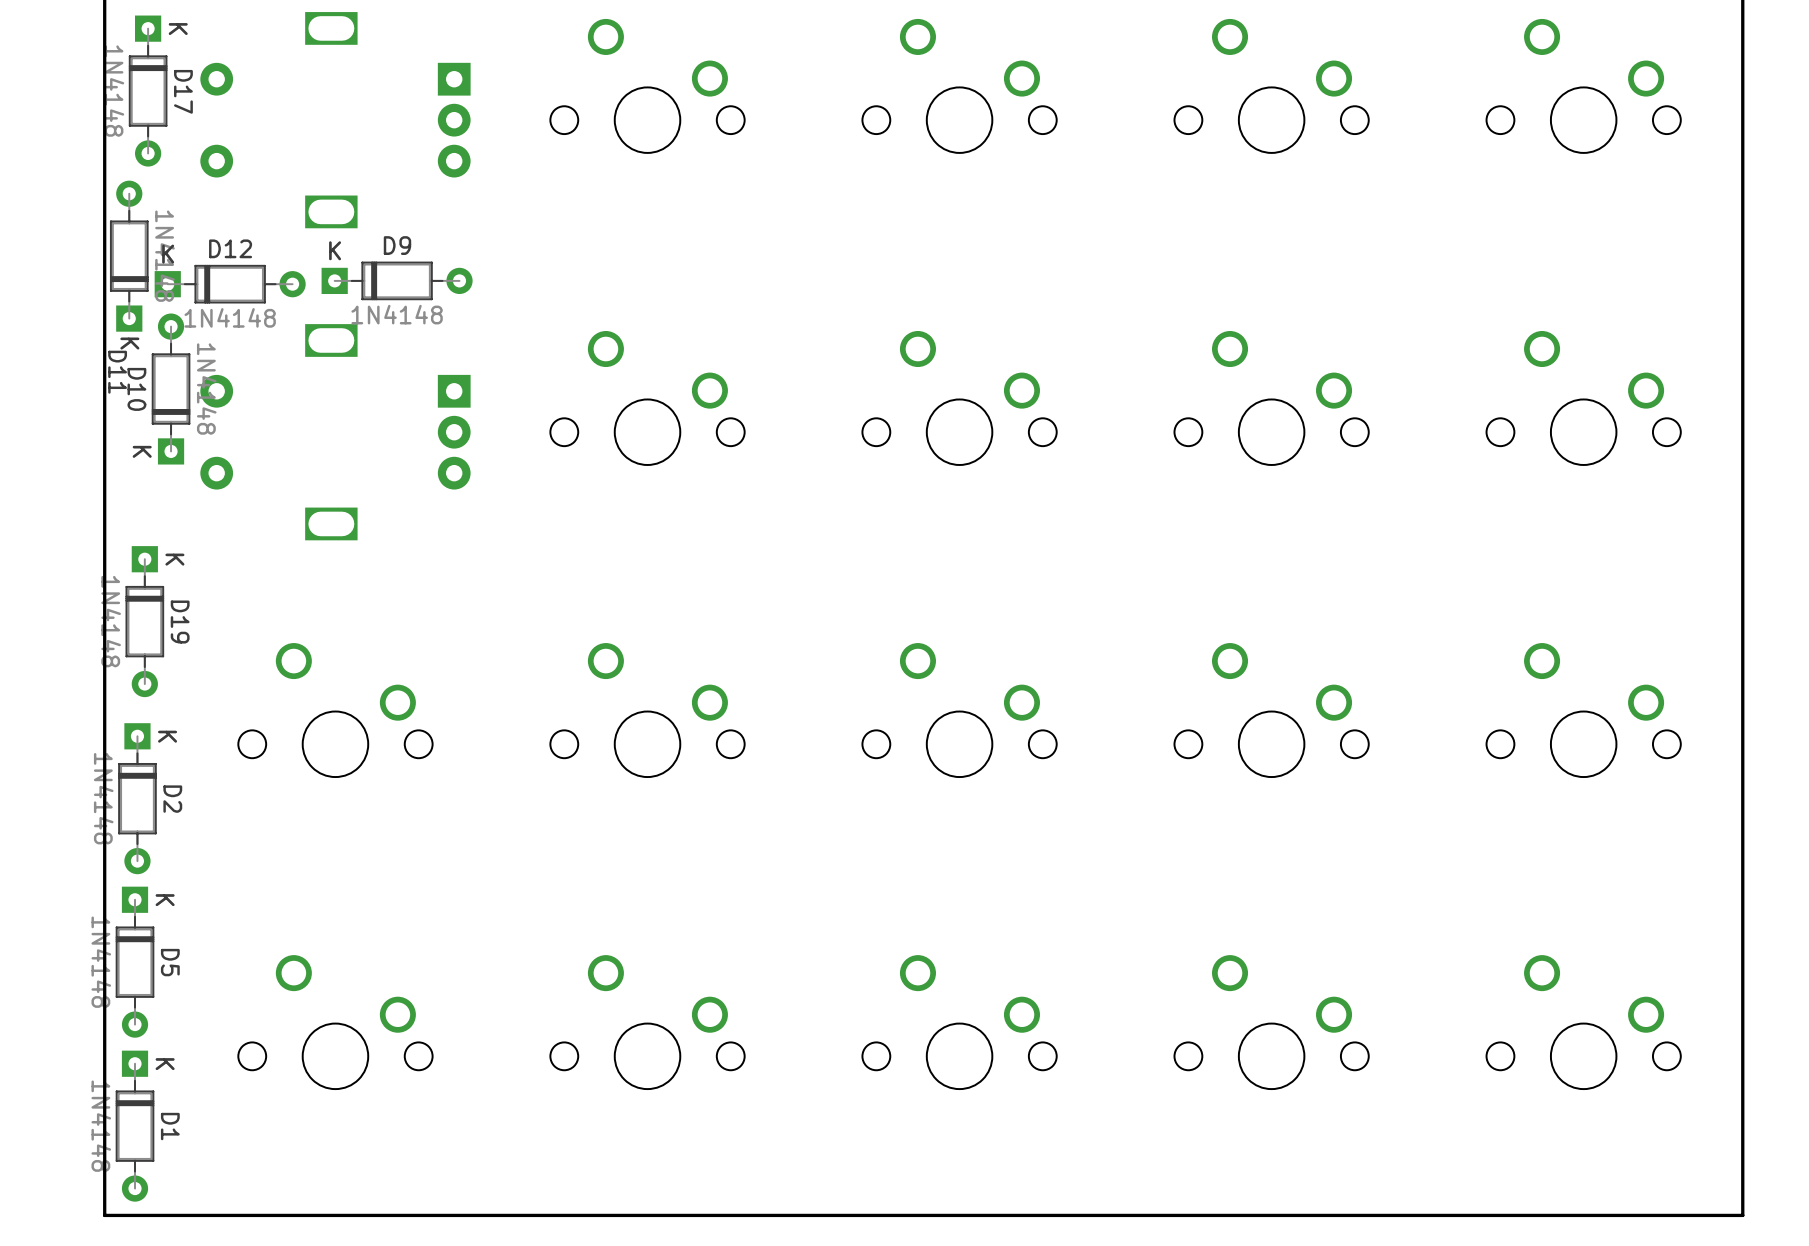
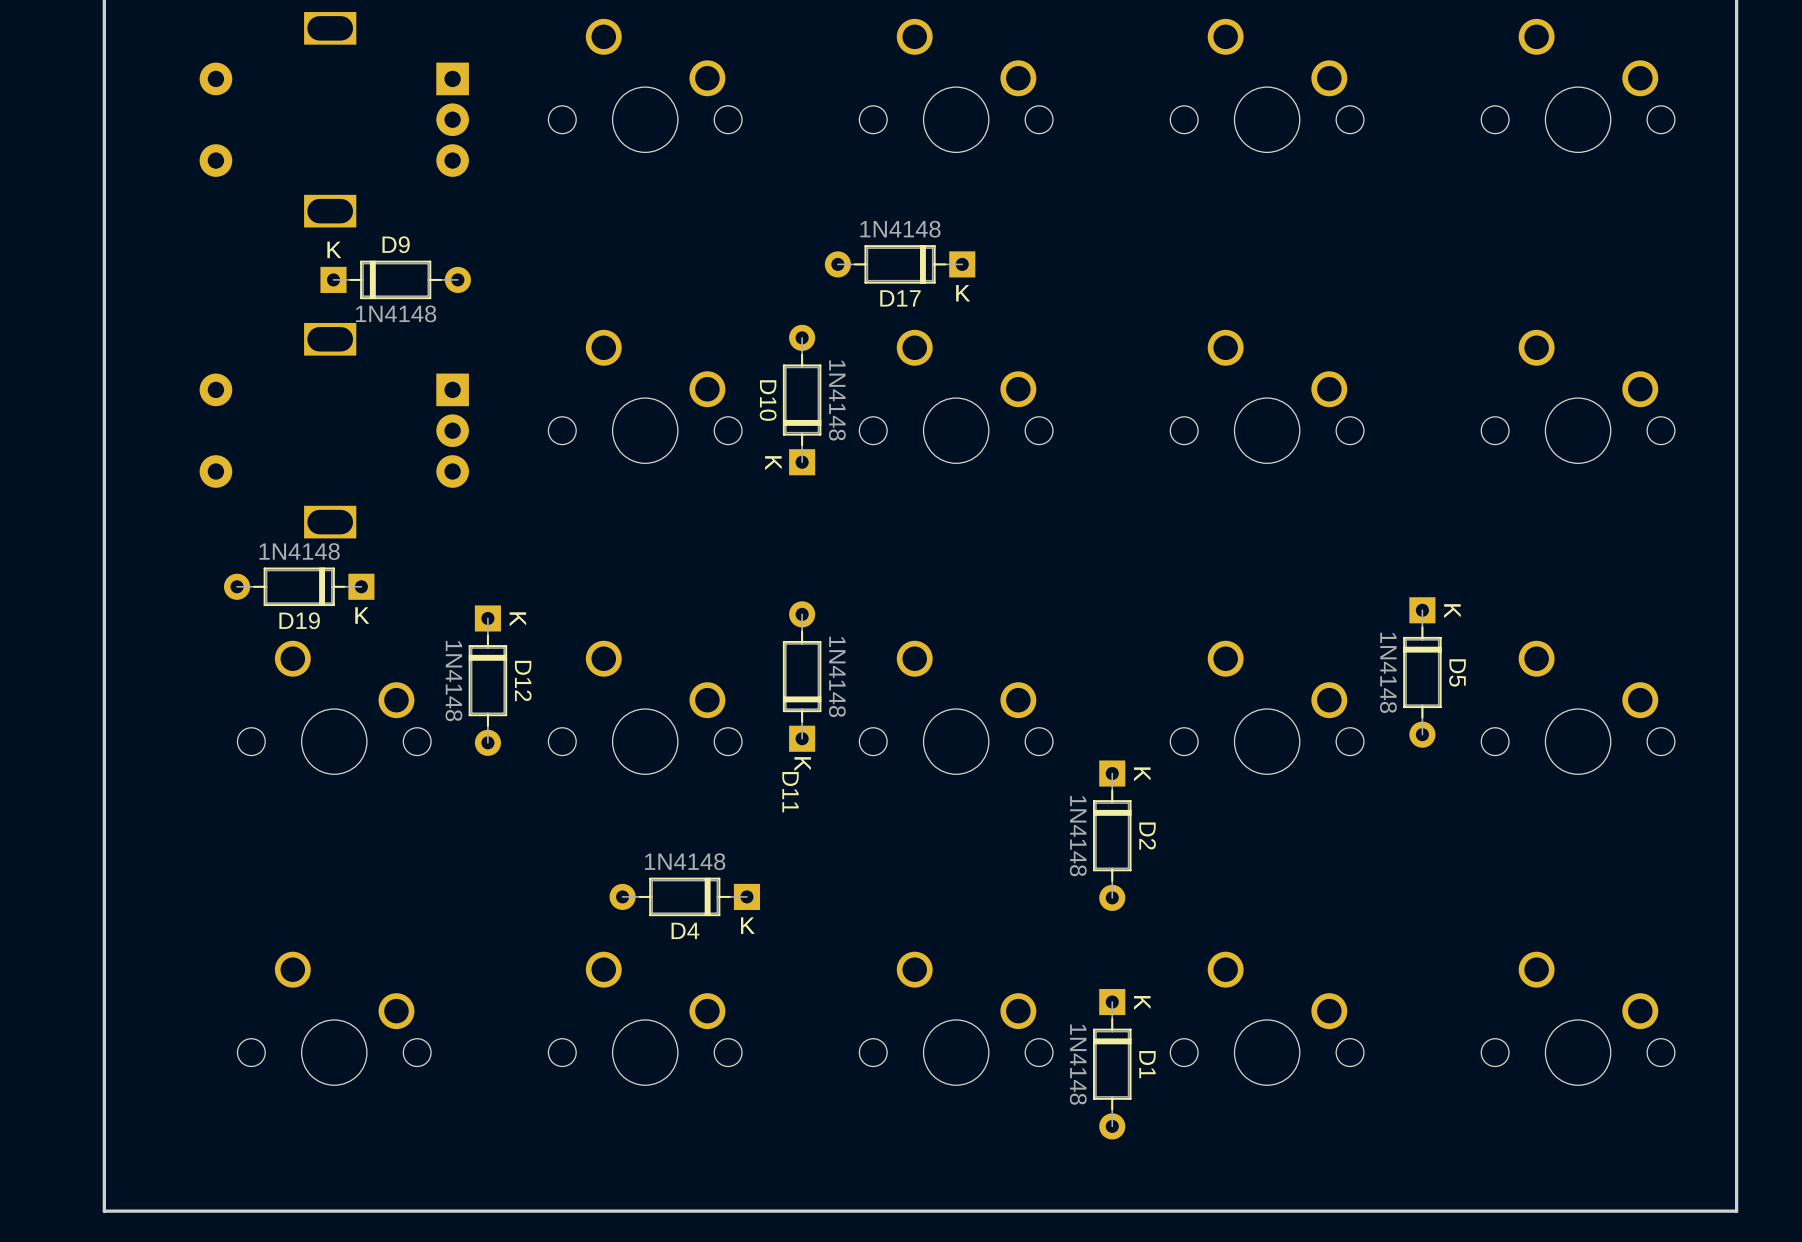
D17 rotation: 0° (148, 91) -> 90° clockwise (900, 264)
D17 position: (148, 91) -> (900, 264)
D11 position: (129, 256) -> (802, 676)
D12 rotation: 0° (230, 284) -> 90° clockwise (487, 680)
D12 position: (230, 284) -> (487, 680)
D10 position: (171, 389) -> (802, 400)
D19 rotation: 0° (144, 621) -> 90° clockwise (299, 586)
D19 position: (144, 621) -> (299, 586)
D2 position: (137, 798) -> (1112, 835)
D4: none -> 1N4148 (684, 896)
D5 position: (135, 962) -> (1422, 672)
D1 position: (135, 1126) -> (1112, 1064)

